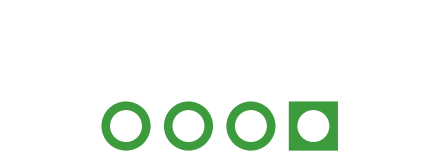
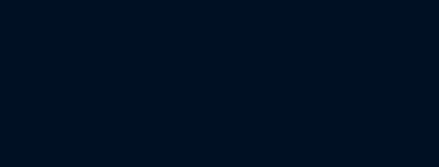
part: (219, 126) -> none

